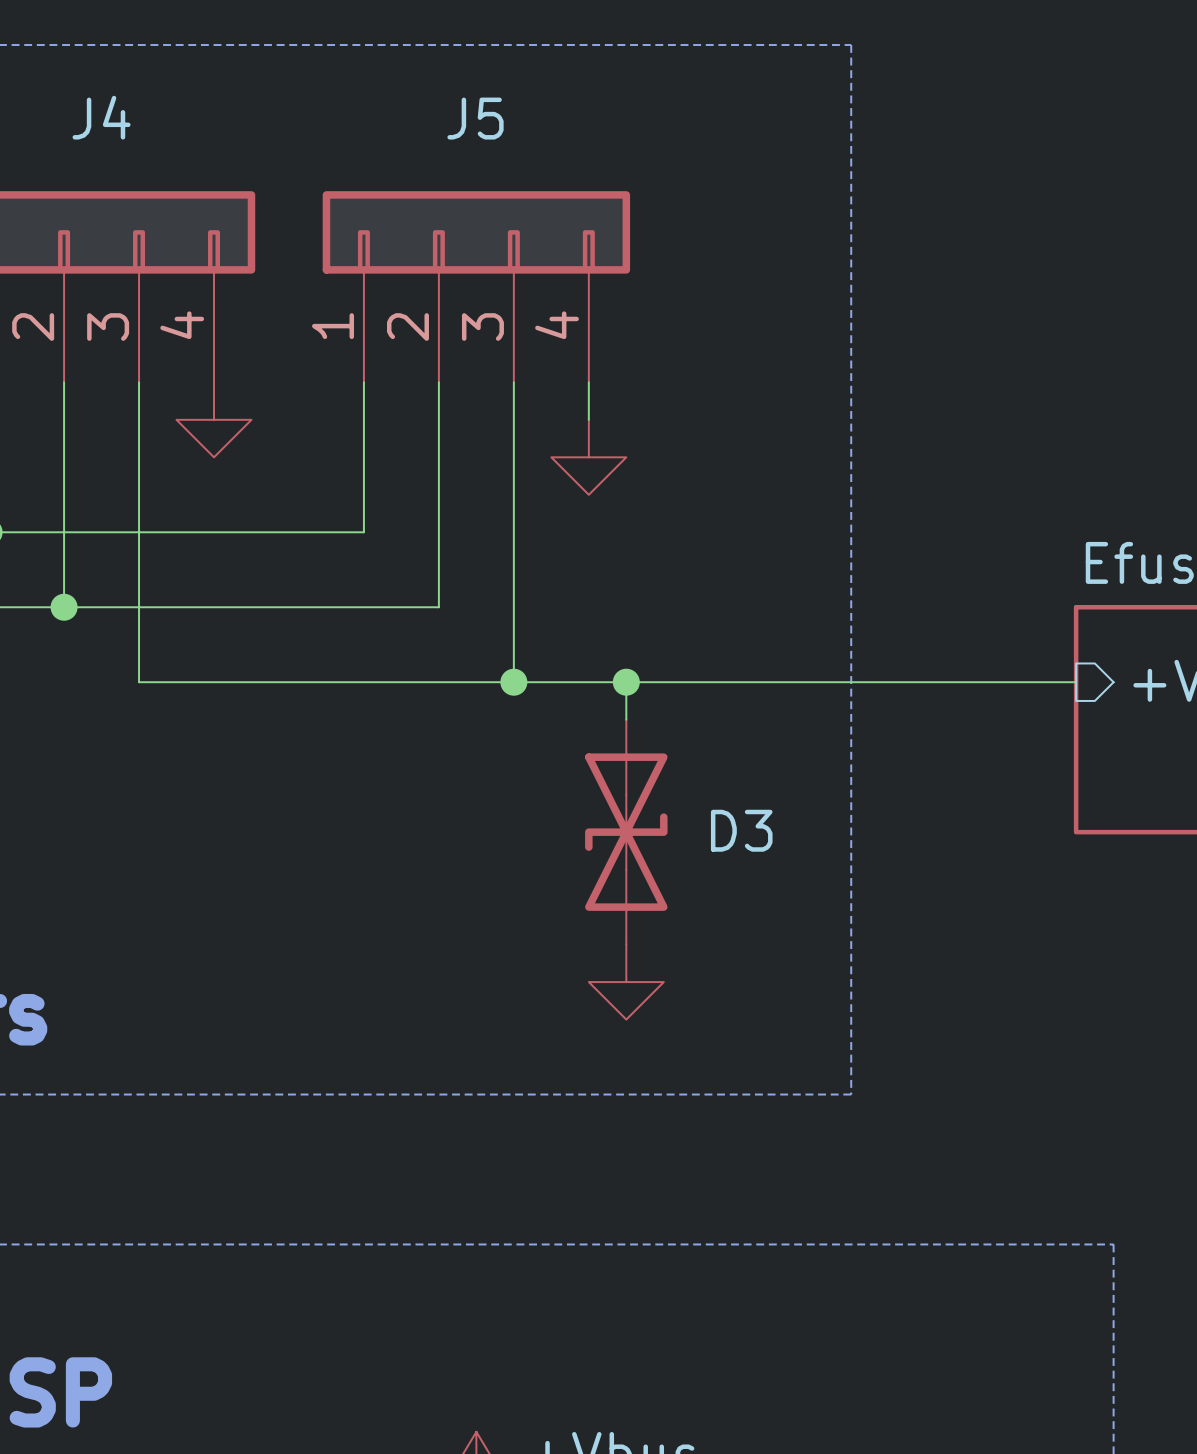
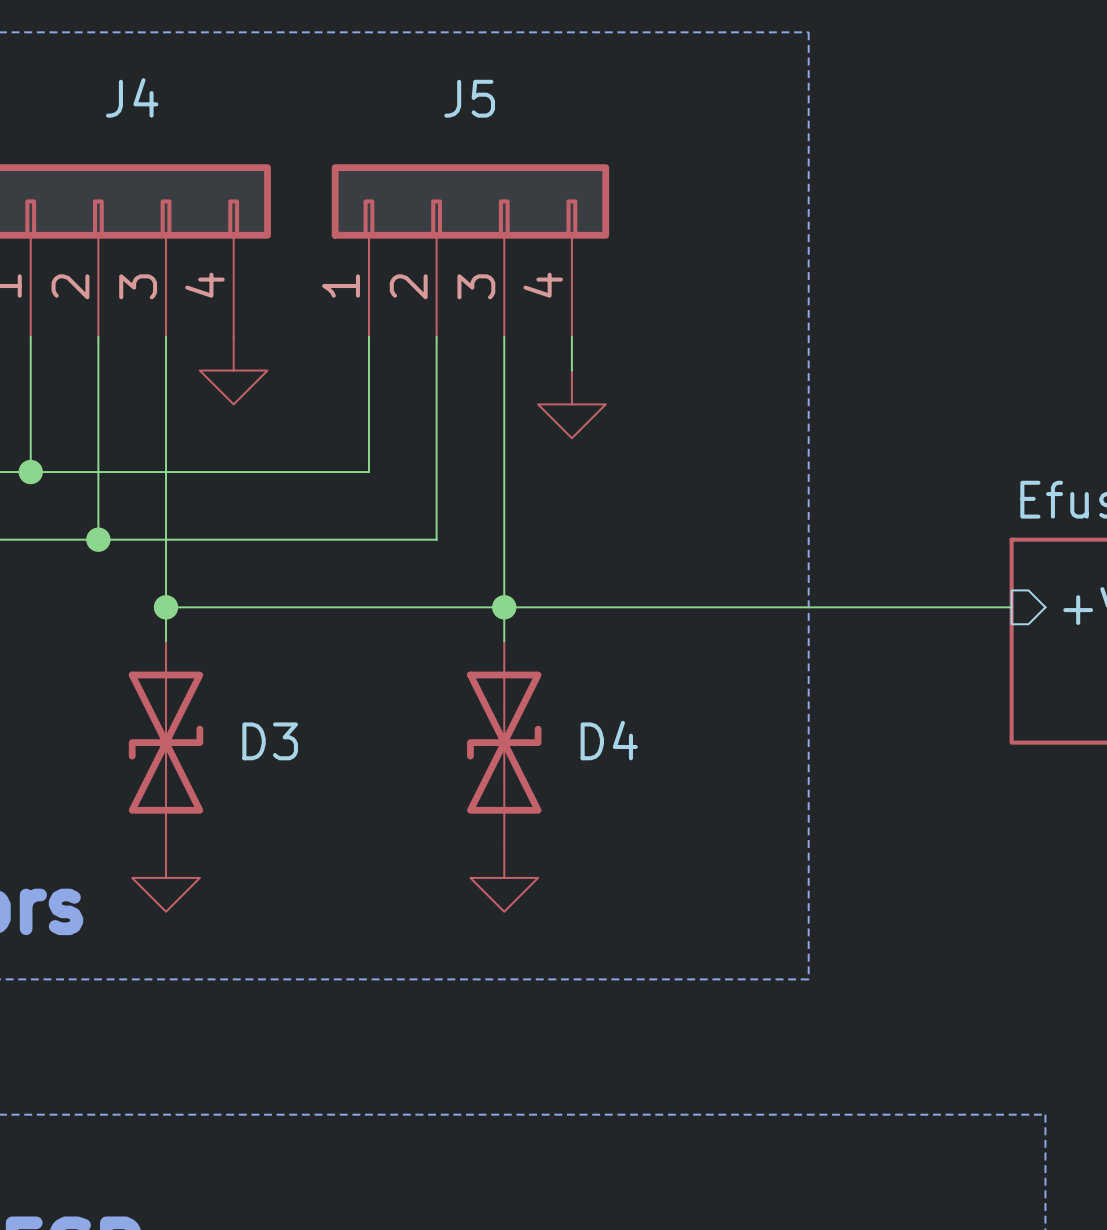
wire: none -> (166, 607) (166, 641)
junction: none -> (166, 607)
wire: (626, 682) (626, 719) -> (504, 607) (504, 641)
junction: (626, 682) -> none
D4: none -> (504, 742)
D3 position: (626, 832) -> (166, 742)
power symbol: none -> (166, 877)
power symbol position: (626, 982) -> (504, 877)

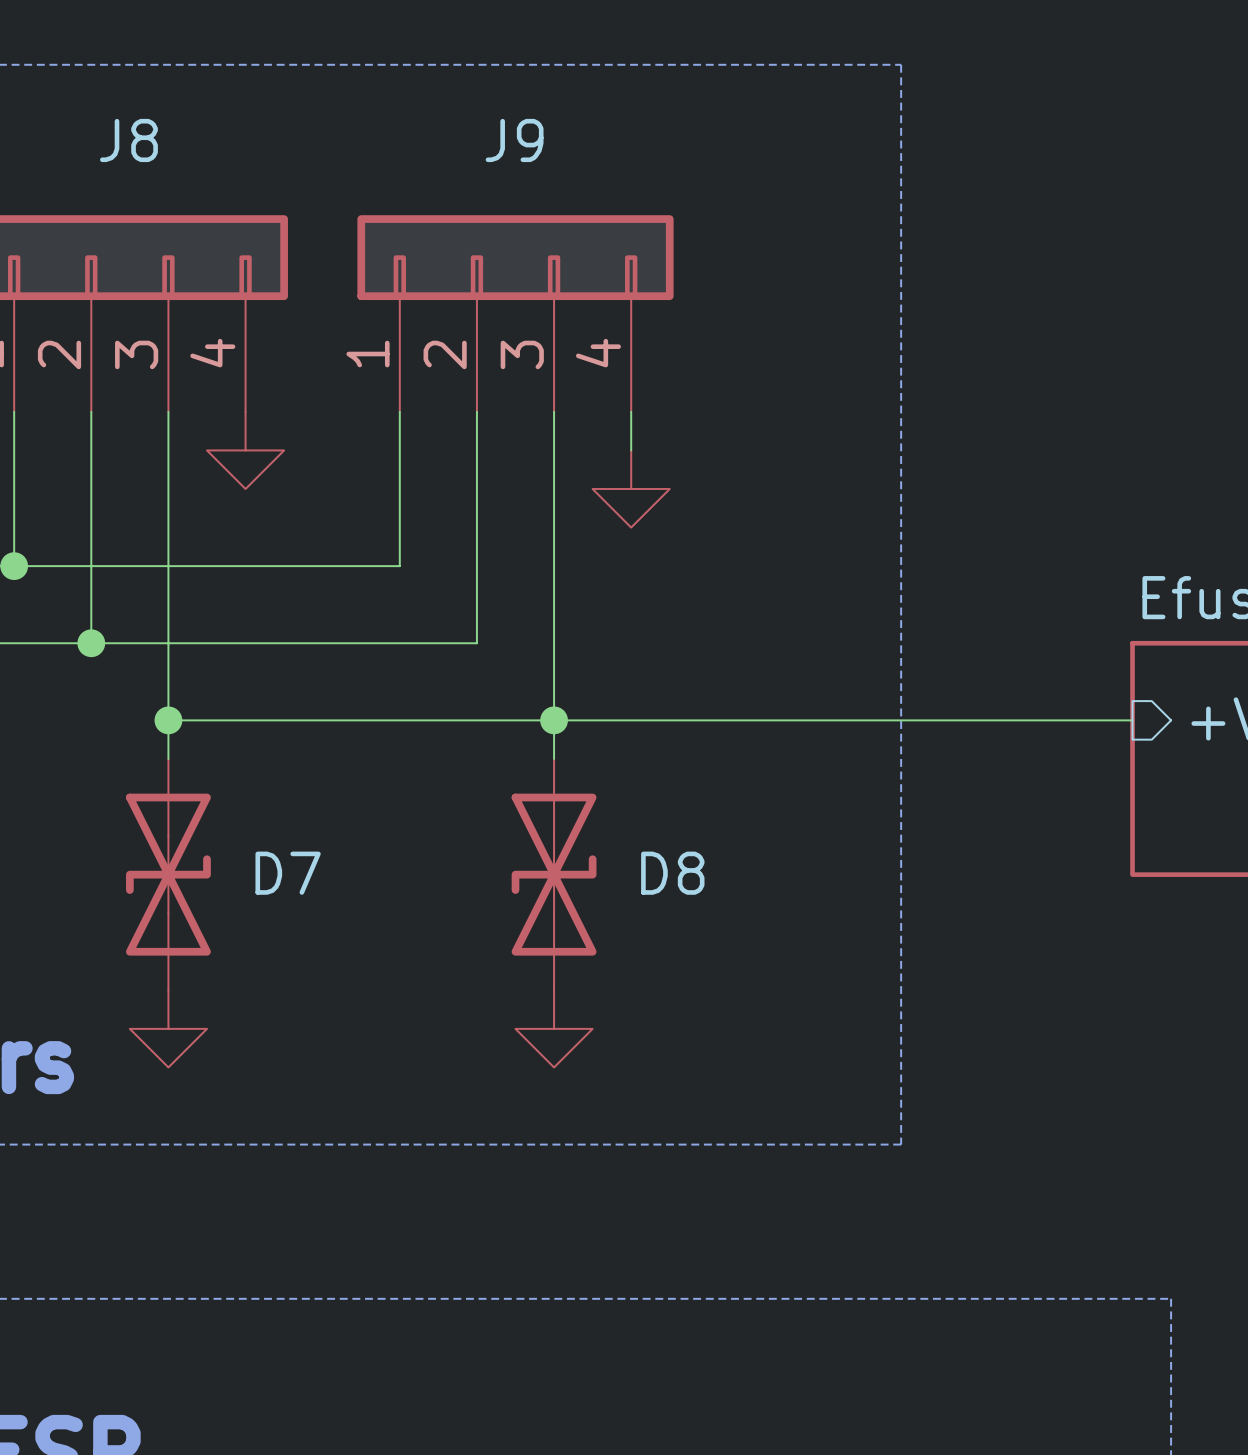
J4 name: J4 (132, 97) -> J8 (128, 140)
J5 name: J5 (469, 98) -> J9 (514, 140)
D4 name: D4 (609, 740) -> D8 (672, 873)
D3 name: D3 (270, 741) -> D7 (288, 873)

